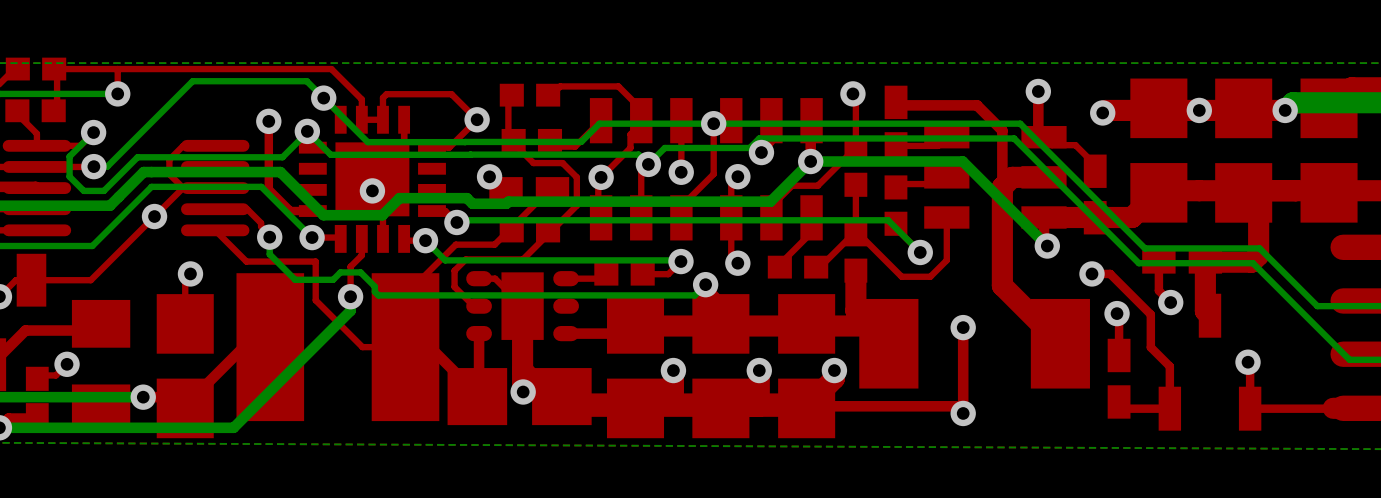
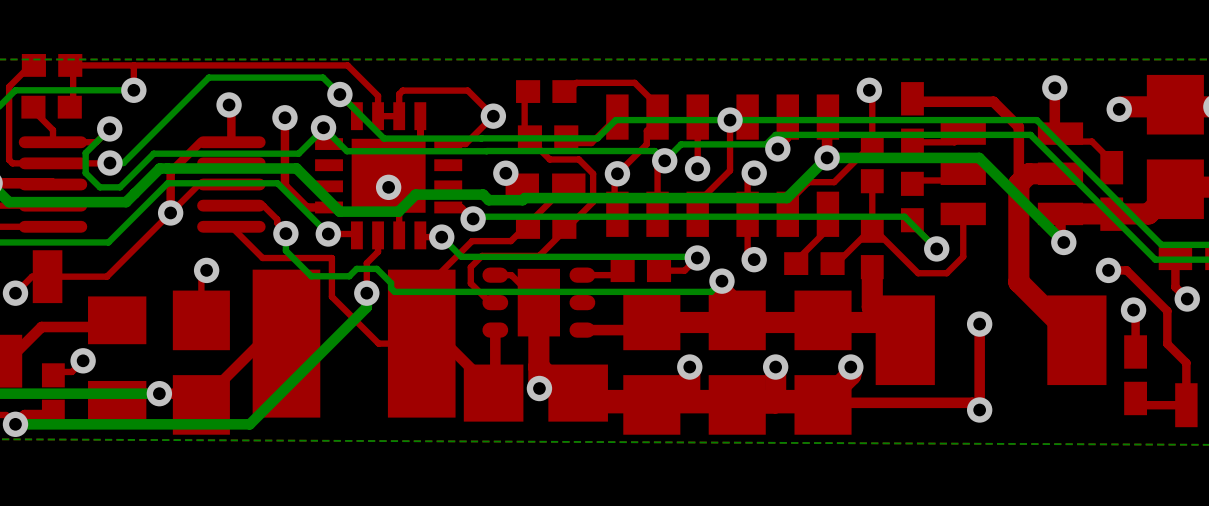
top track: none -> (229, 104) (231, 107) (231, 142)
via: none -> (229, 104)
top track: (184, 145) (169, 159) (169, 174) (183, 188) -> (200, 142) (170, 172) (170, 212)

